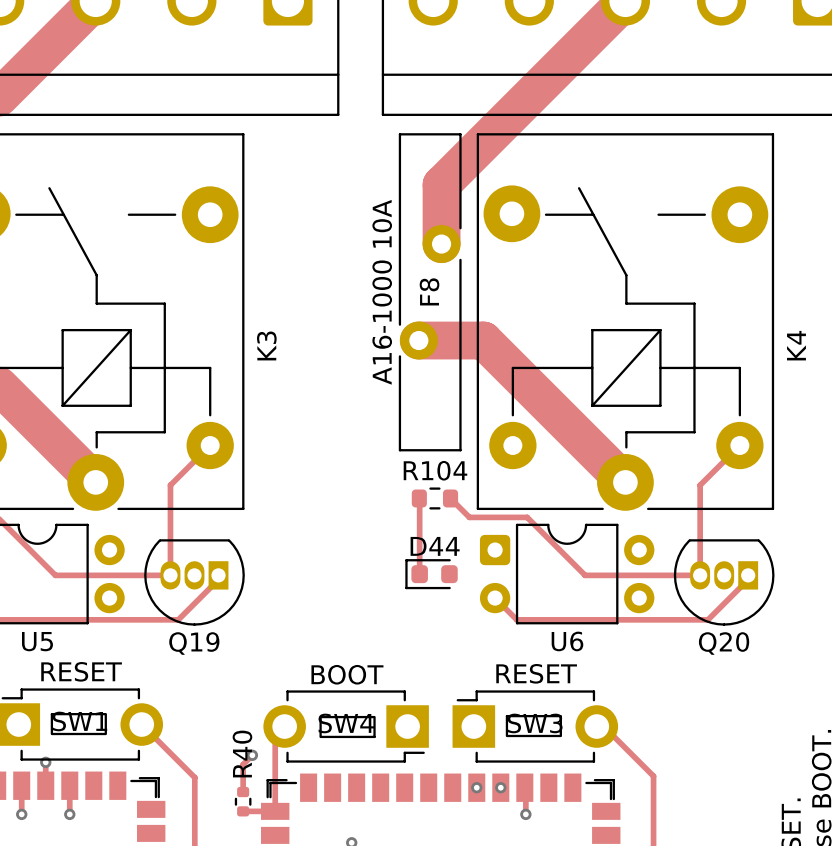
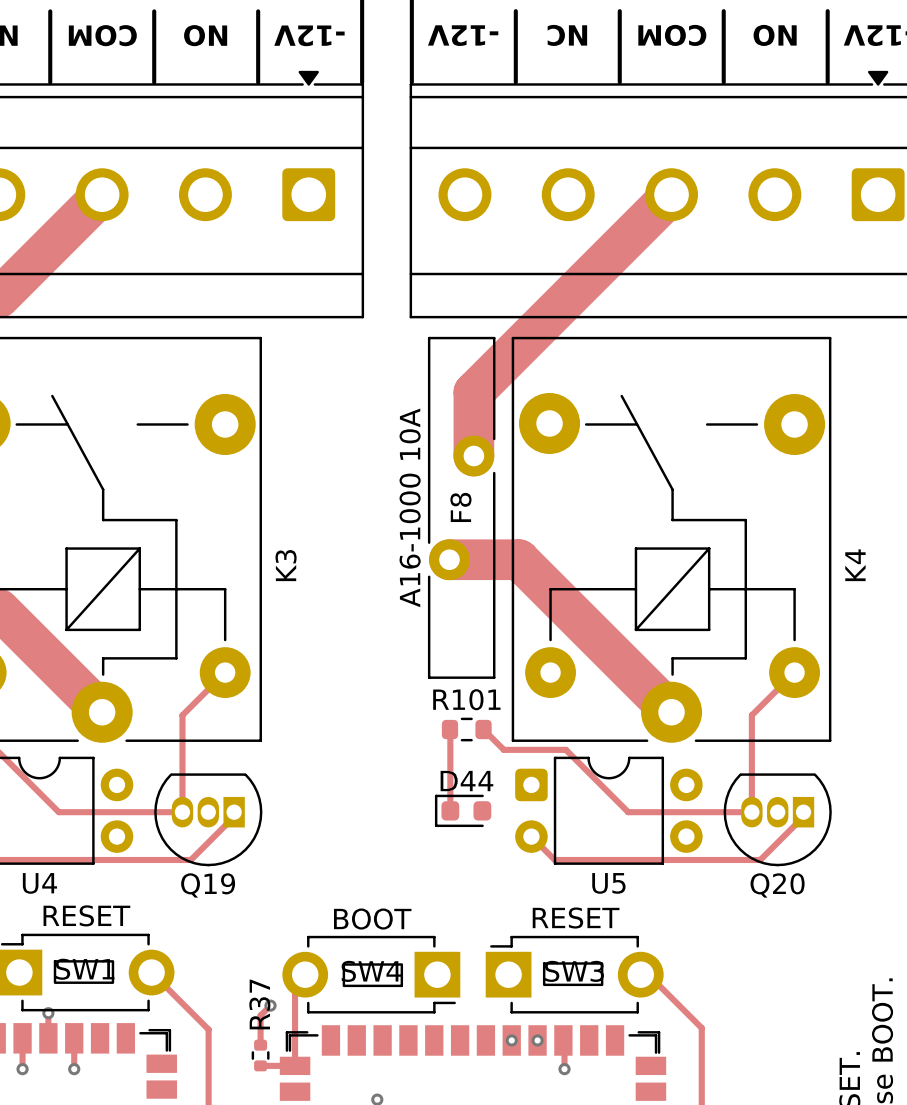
R104 name: R104 (435, 470) -> R101 (466, 699)
U5 name: U5 (37, 641) -> U4 (39, 883)
U6 name: U6 (567, 641) -> U5 (608, 883)
R40 name: R40 (242, 754) -> R37 (259, 1004)

